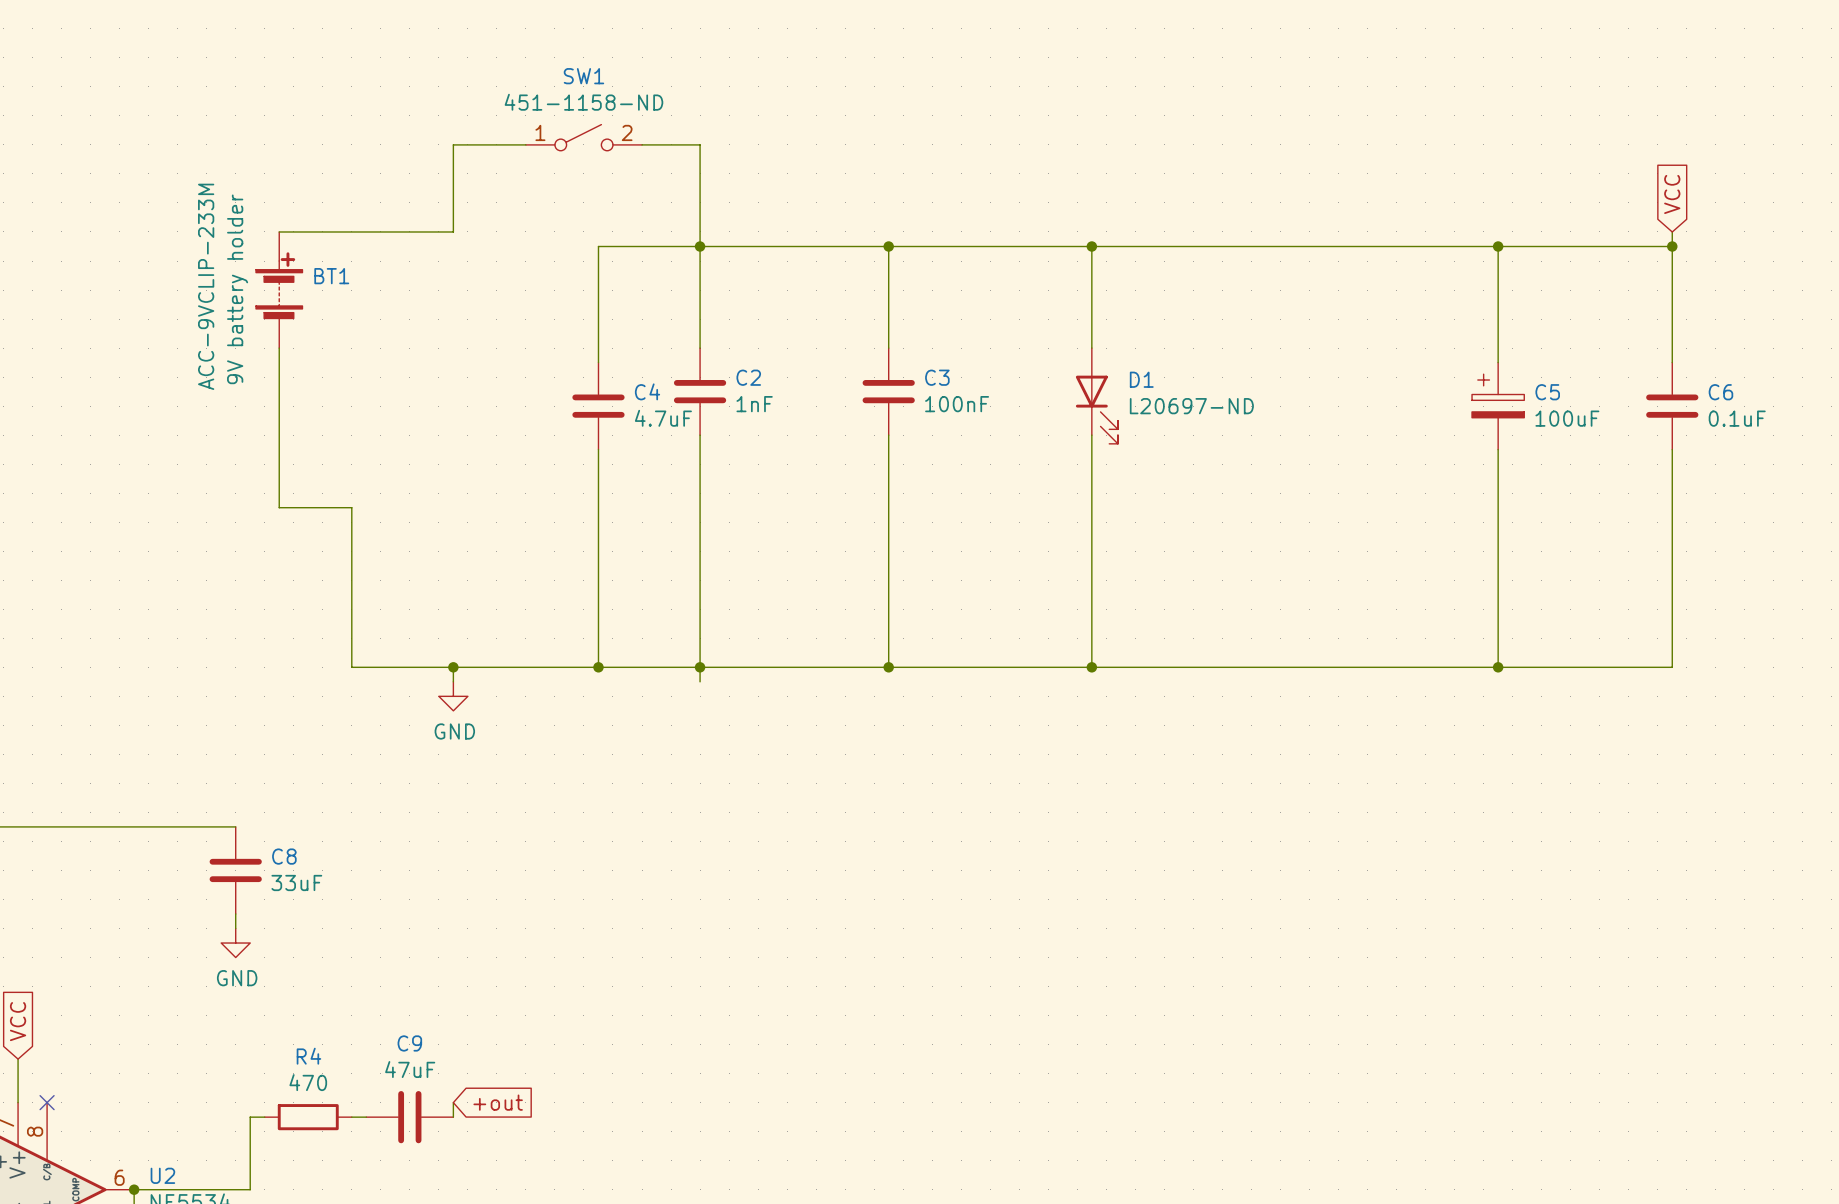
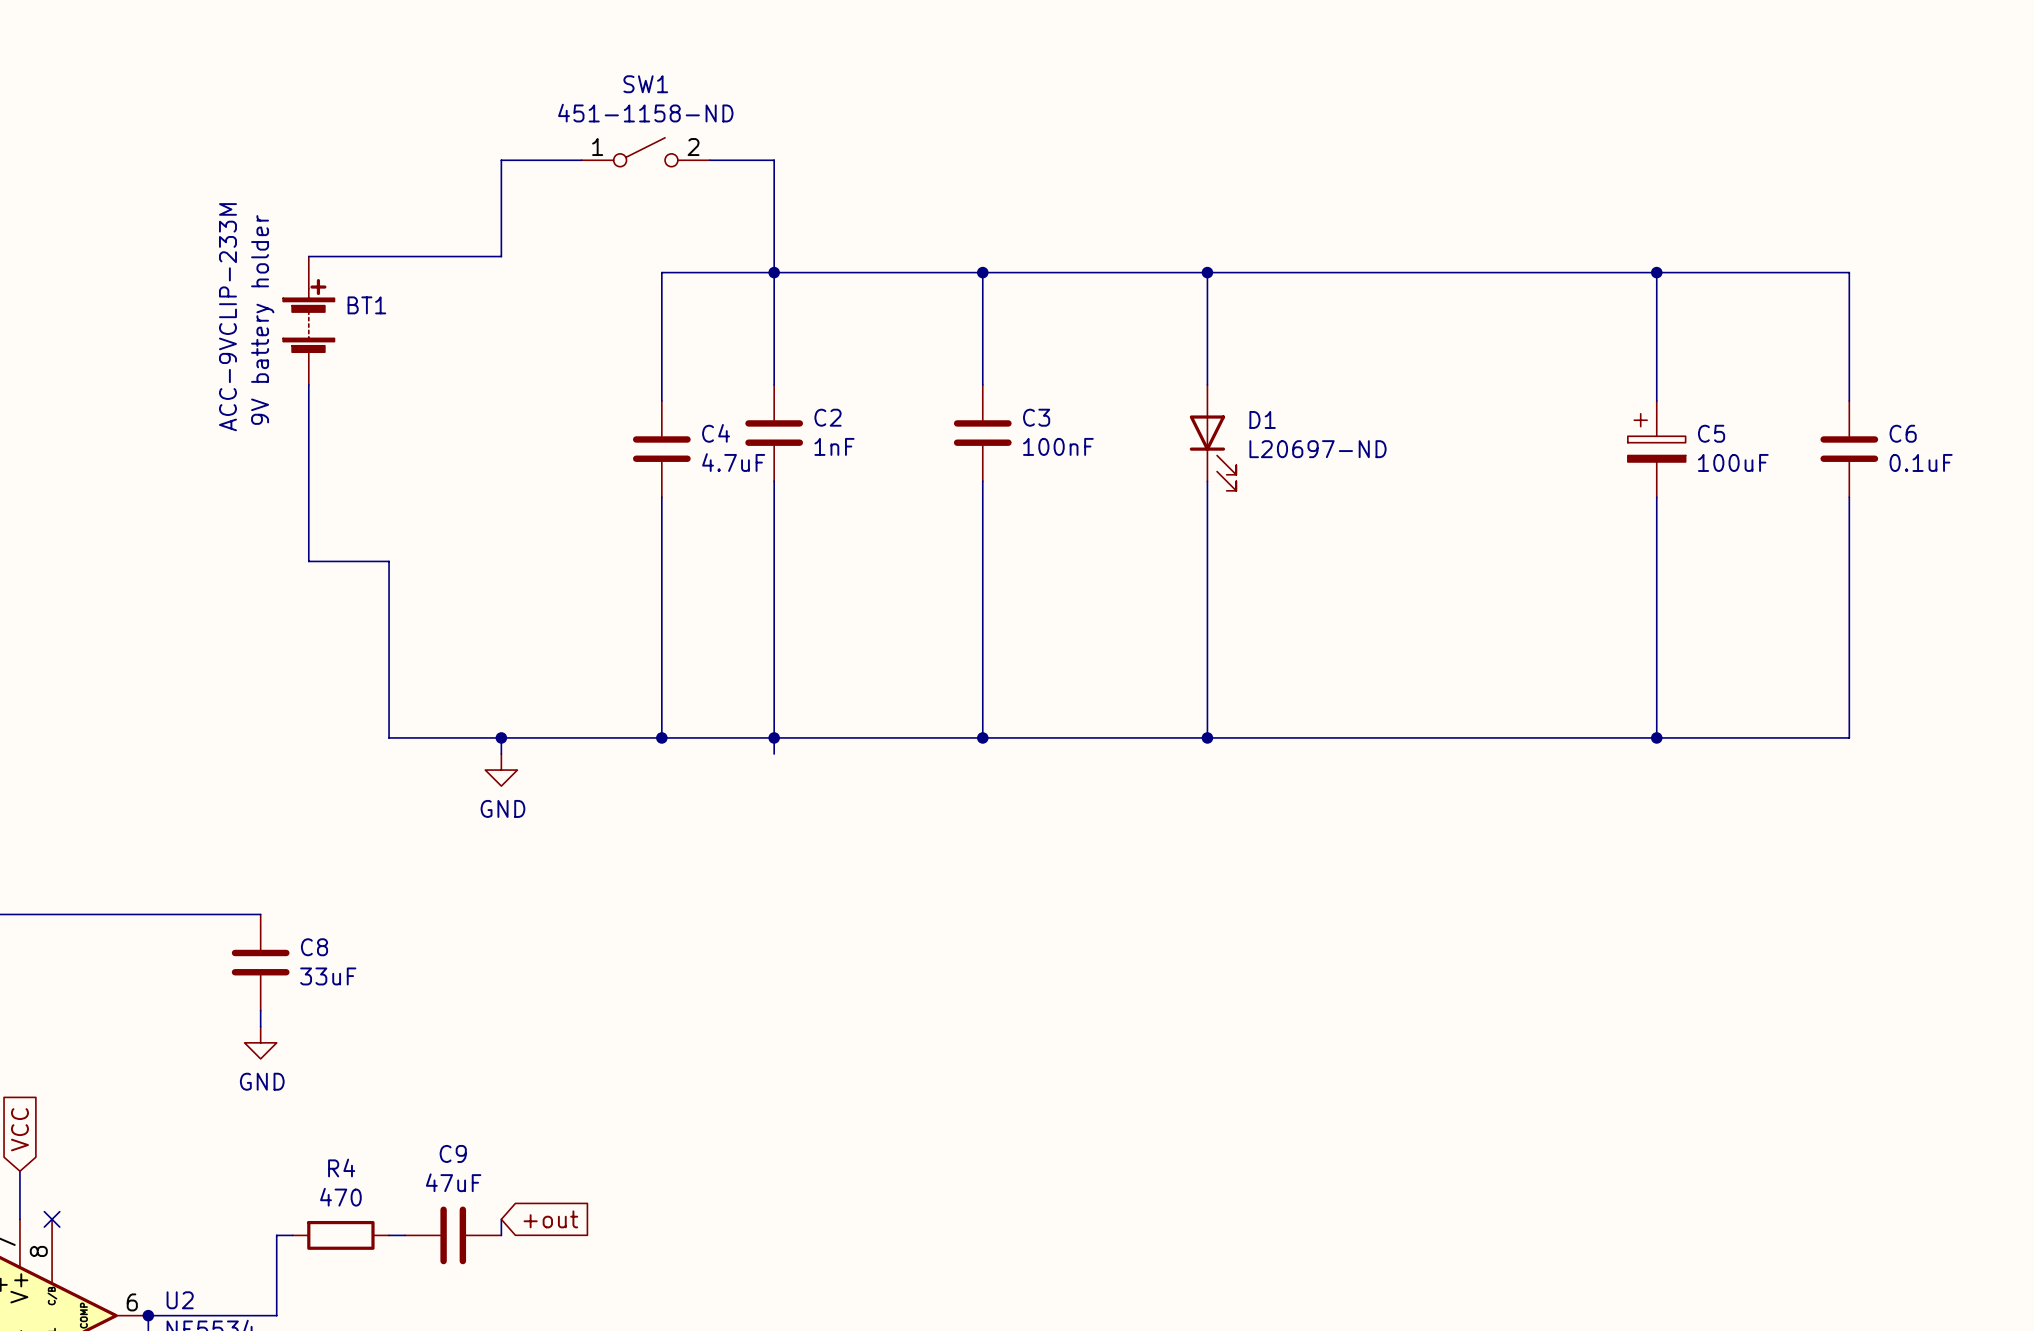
global label: VCC (1672, 194) -> none
wire: (1672, 231) (1672, 246) -> none
junction: (1672, 246) -> none

